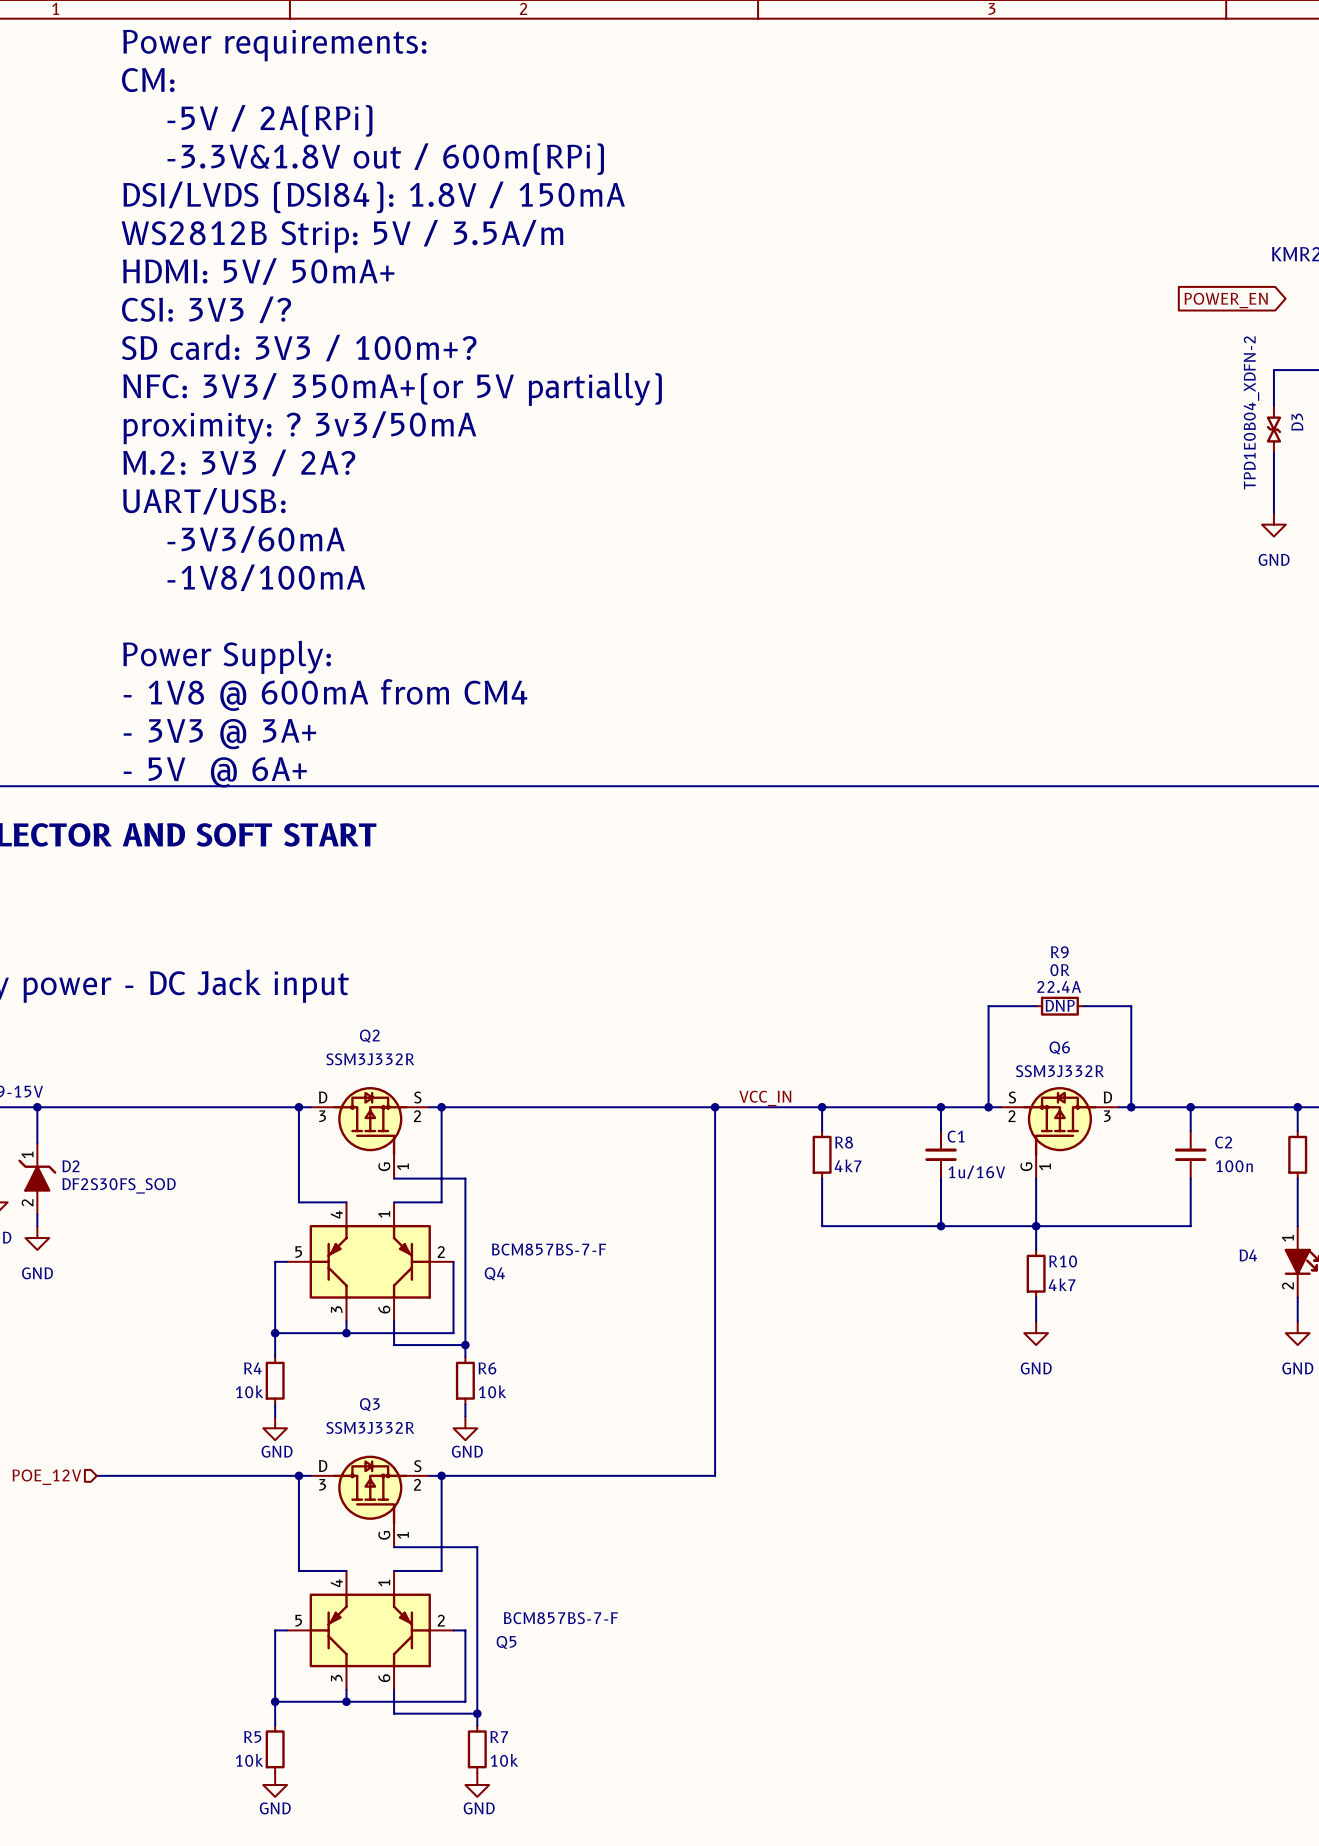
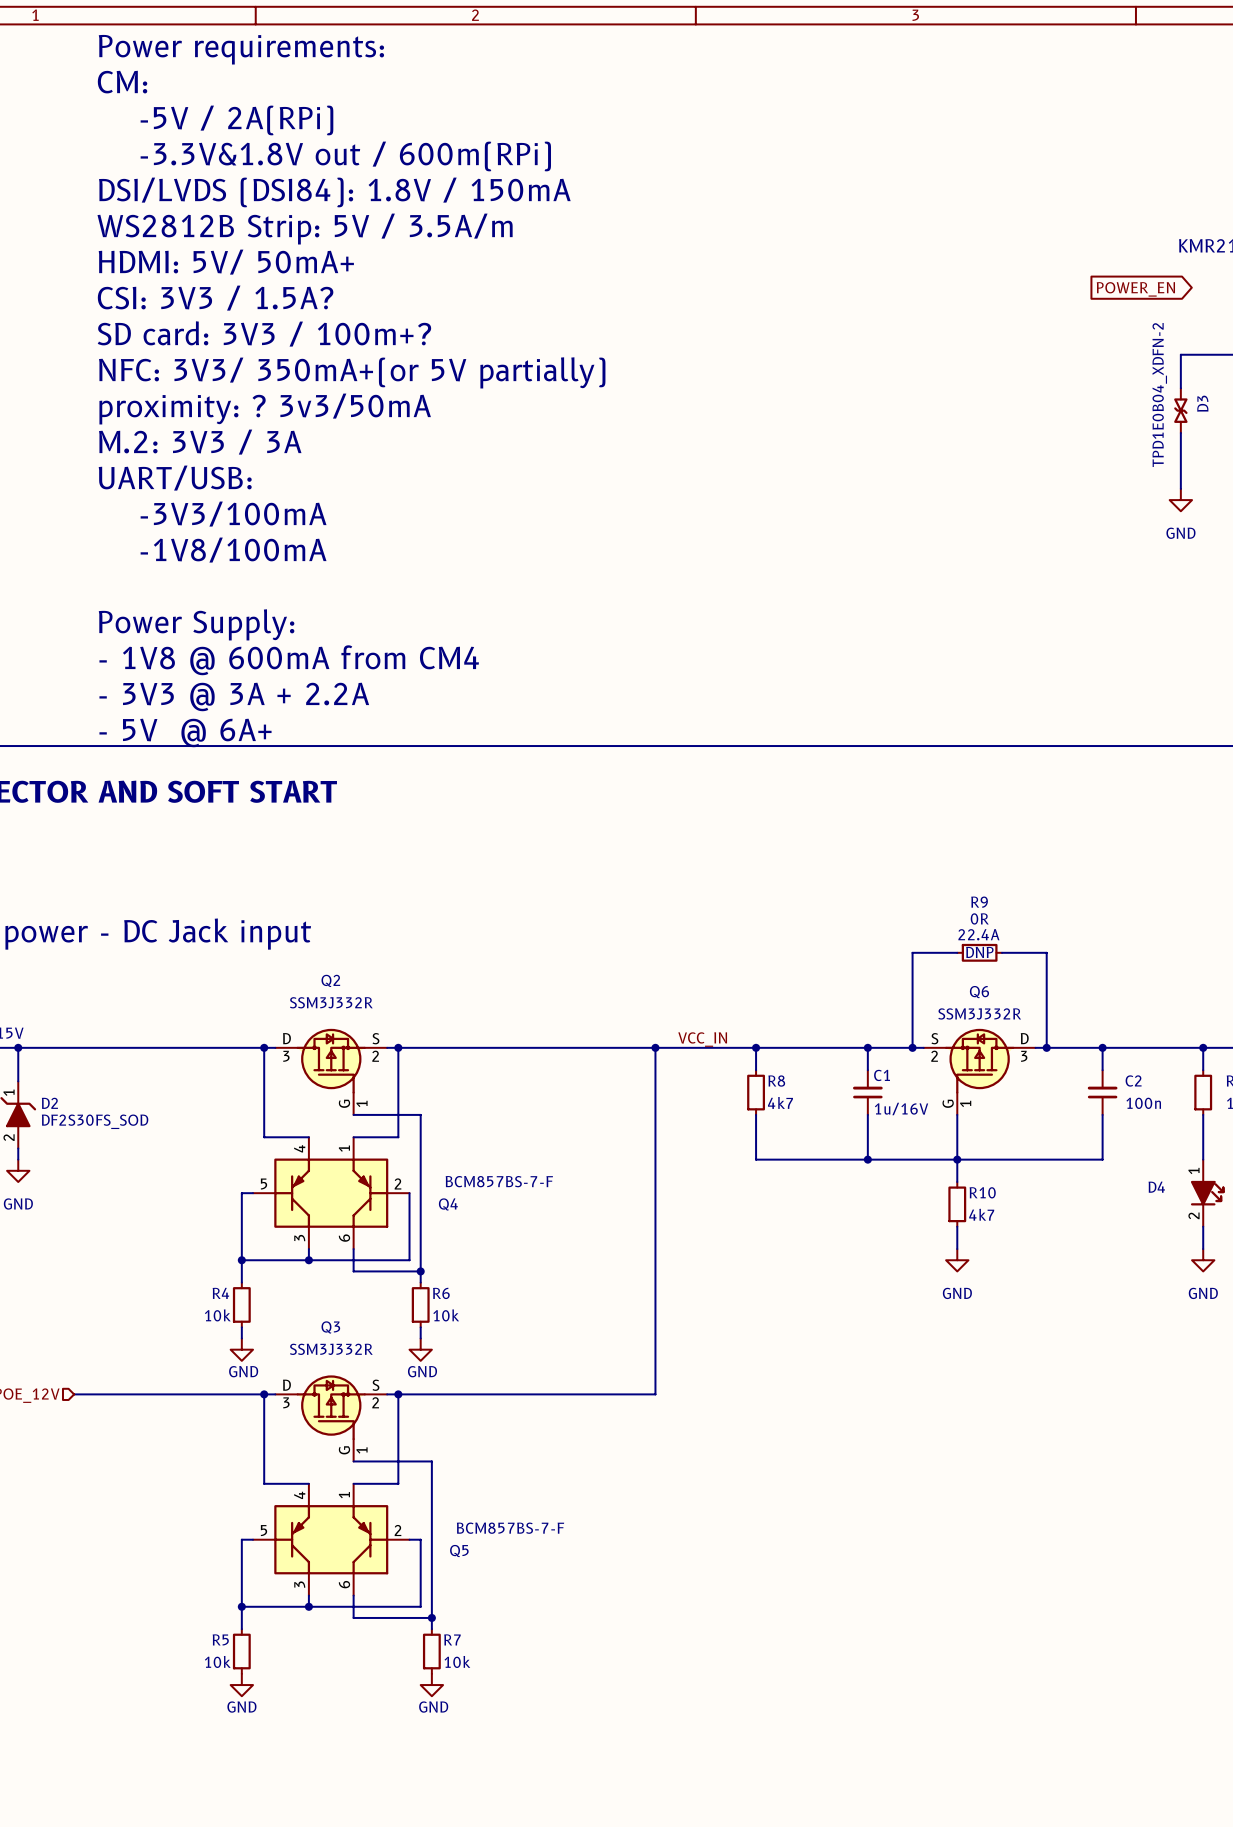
text: CSI: 3V3 /? (206, 309) -> CSI: 3V3 / 1.5A? (215, 298)
text: M.2: 3V3 / 2A? (239, 462) -> M.2: 3V3 / 3A (200, 442)
text: -3V3/60mA (256, 539) -> -3V3/100mA (233, 514)
text: - 3V3 @ 3A+ (219, 734) -> - 3V3 @ 3A + 2.2A (234, 696)

